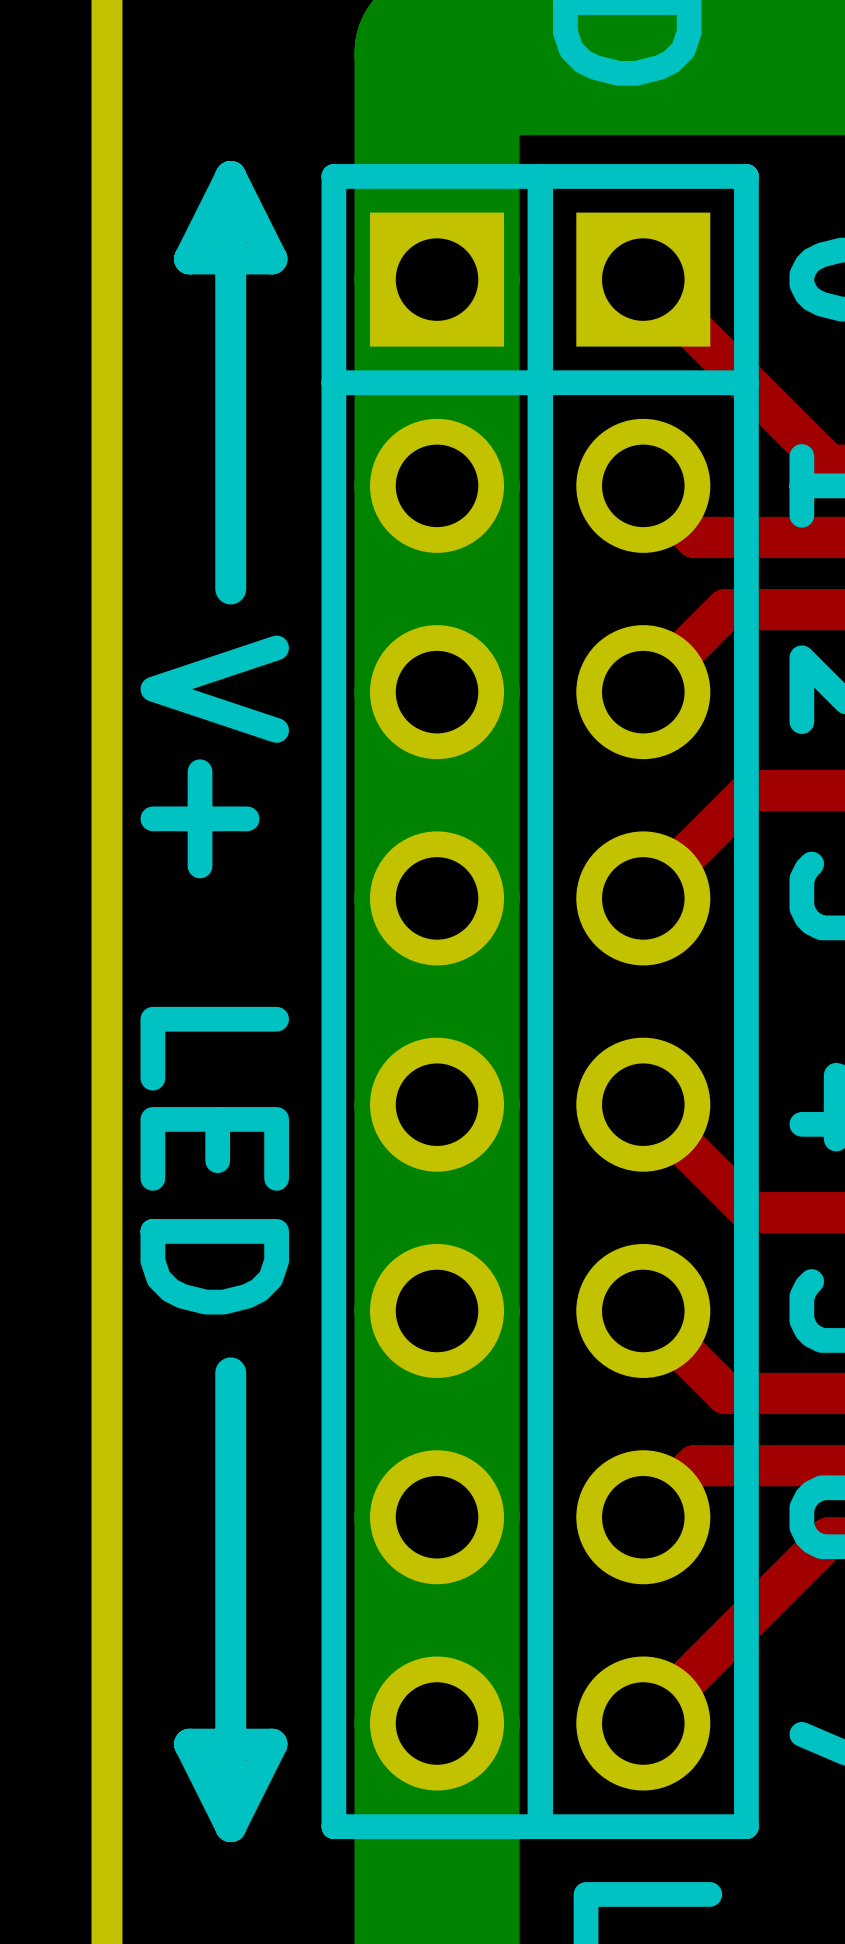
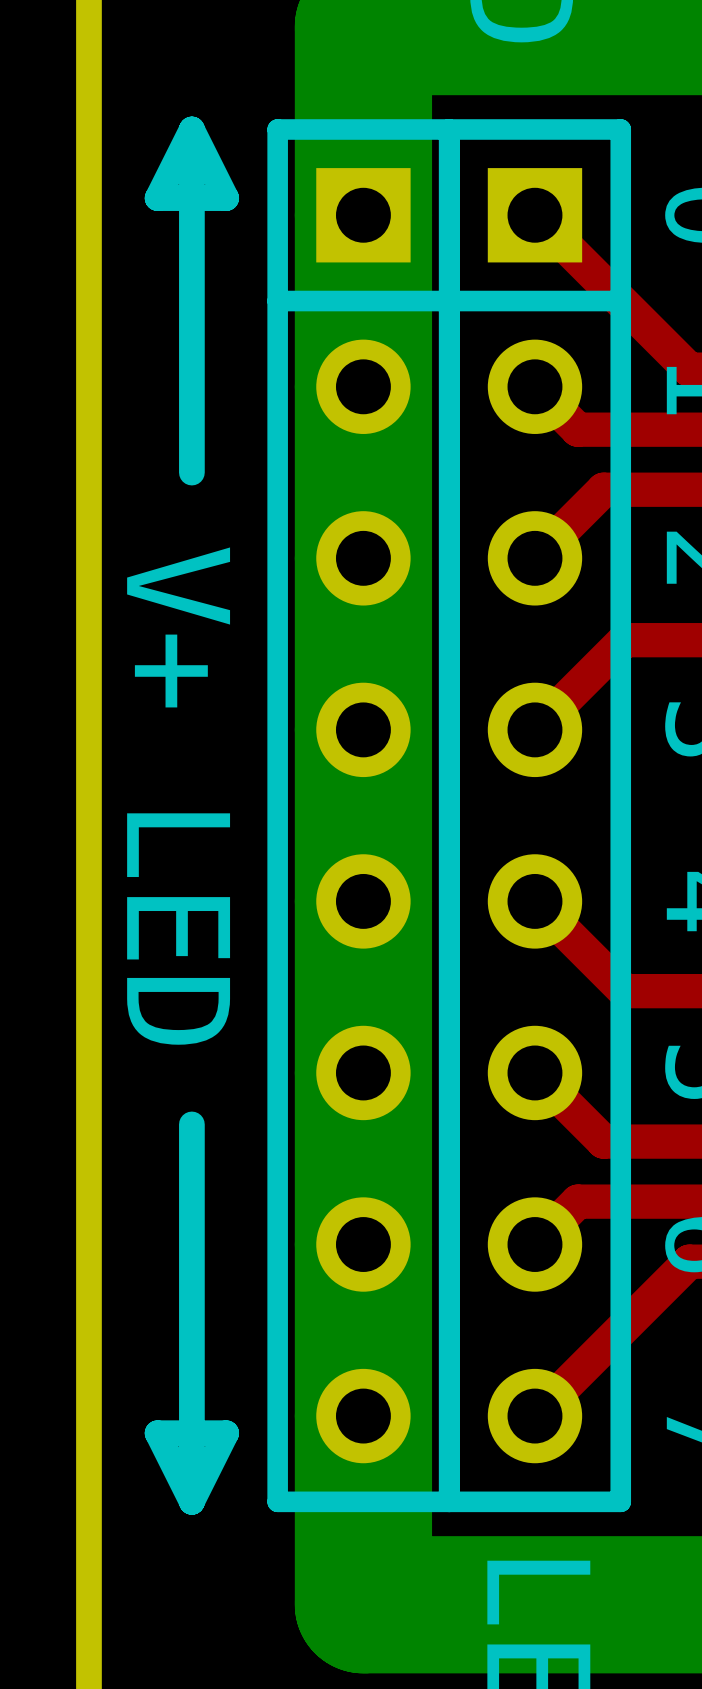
part footprint: [321, 164, 553, 1840] -> [267, 119, 460, 1513]
part footprint: [527, 164, 759, 1840] -> [438, 119, 632, 1513]

